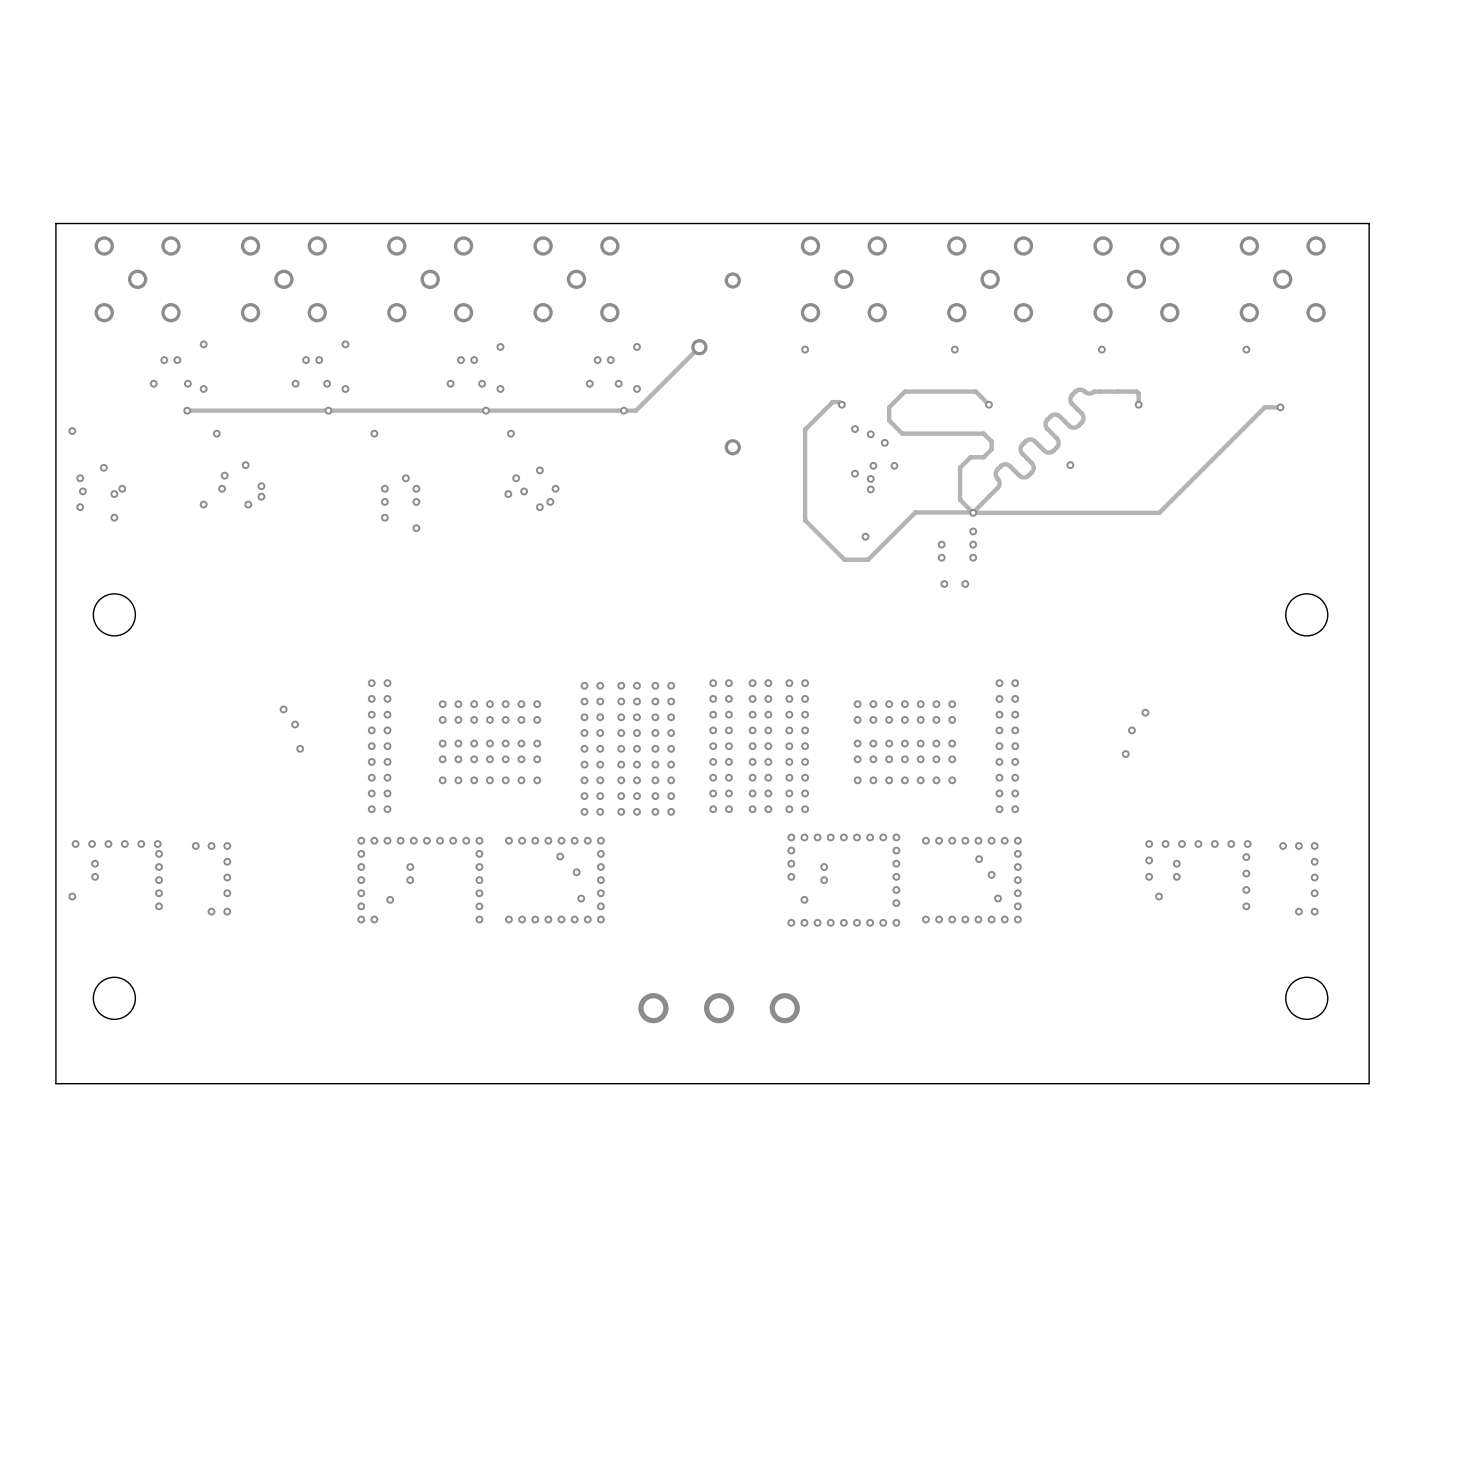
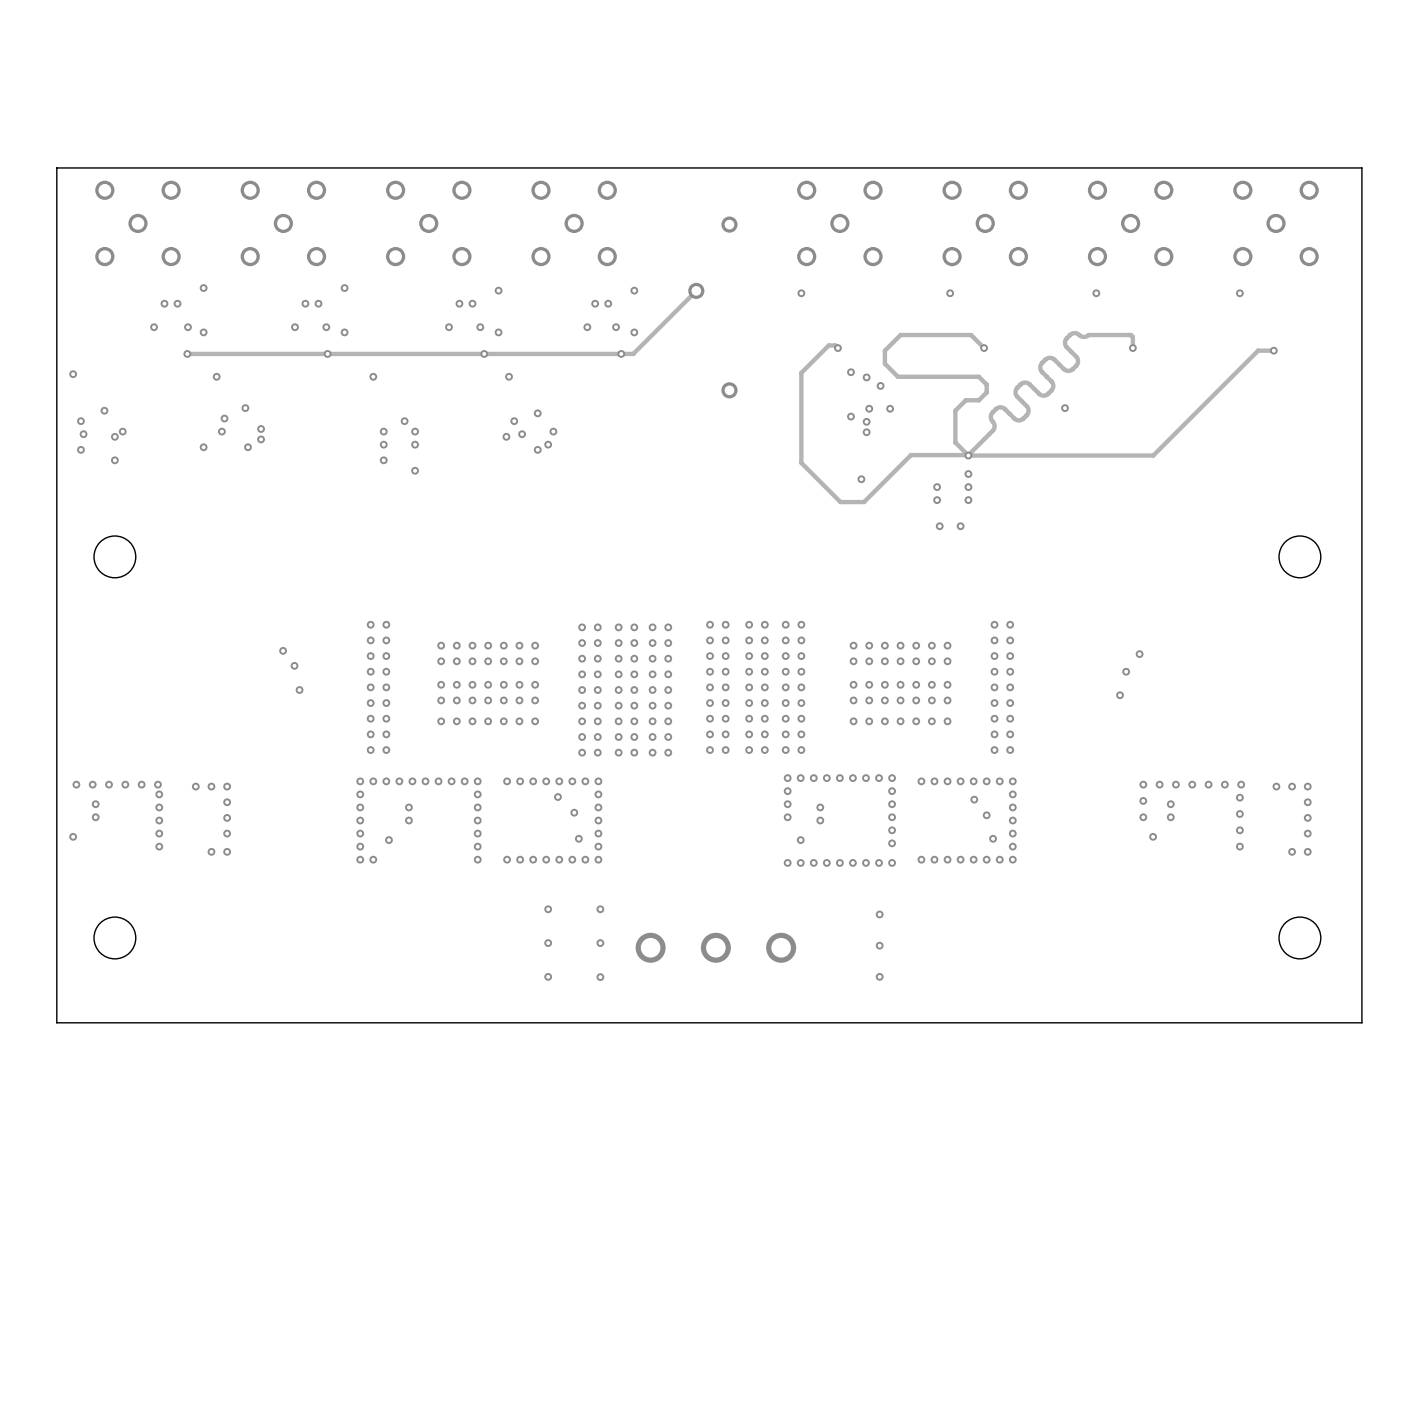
via: none -> (548, 909)
via: none -> (600, 909)
via: none -> (879, 914)
via: none -> (548, 943)
via: none -> (600, 943)
via: none -> (879, 945)
via: none -> (548, 976)
via: none -> (600, 977)
via: none -> (879, 976)

